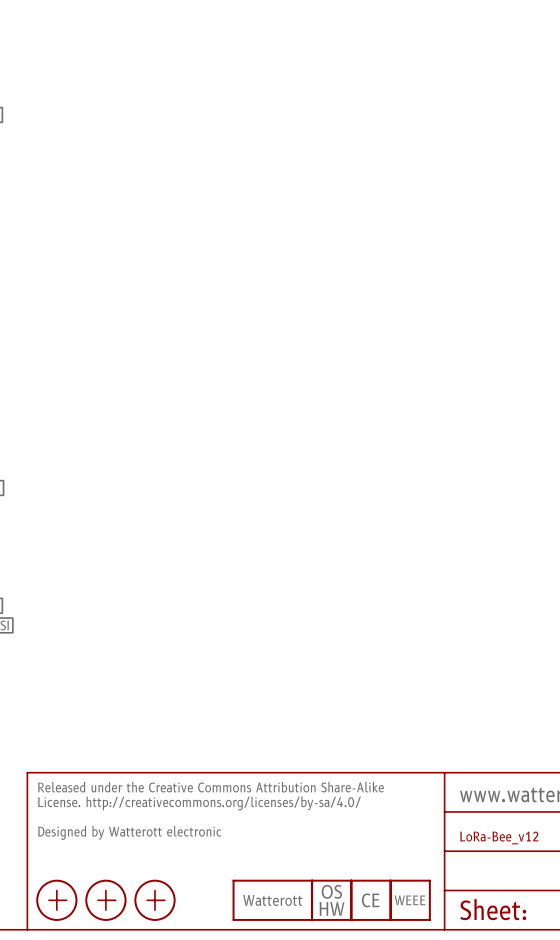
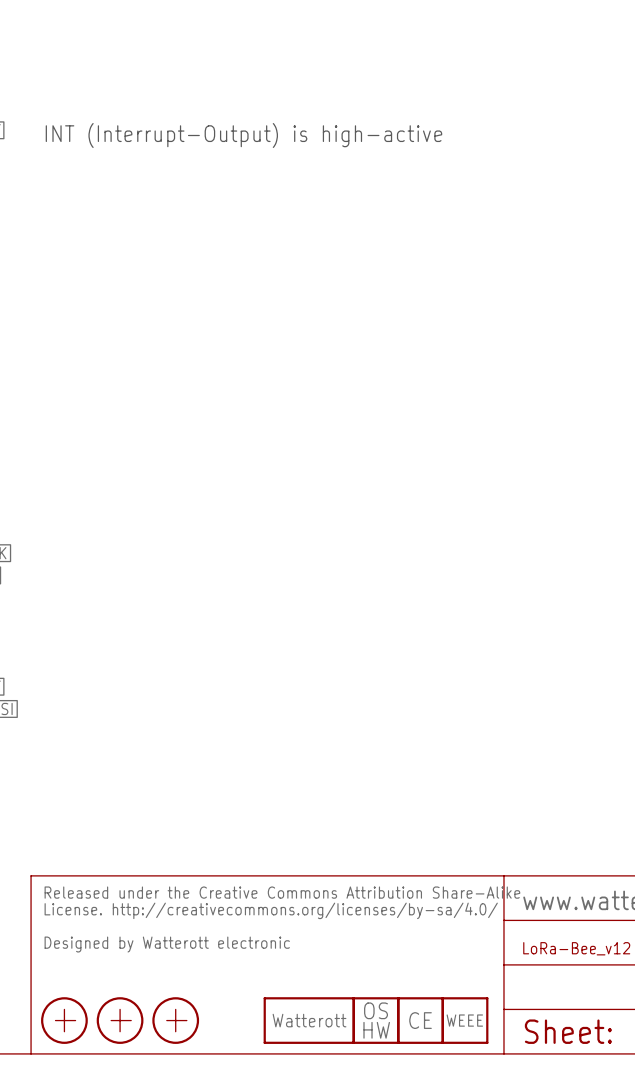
text: none -> INT (Interrupt-Output) is high-active (243, 135)

